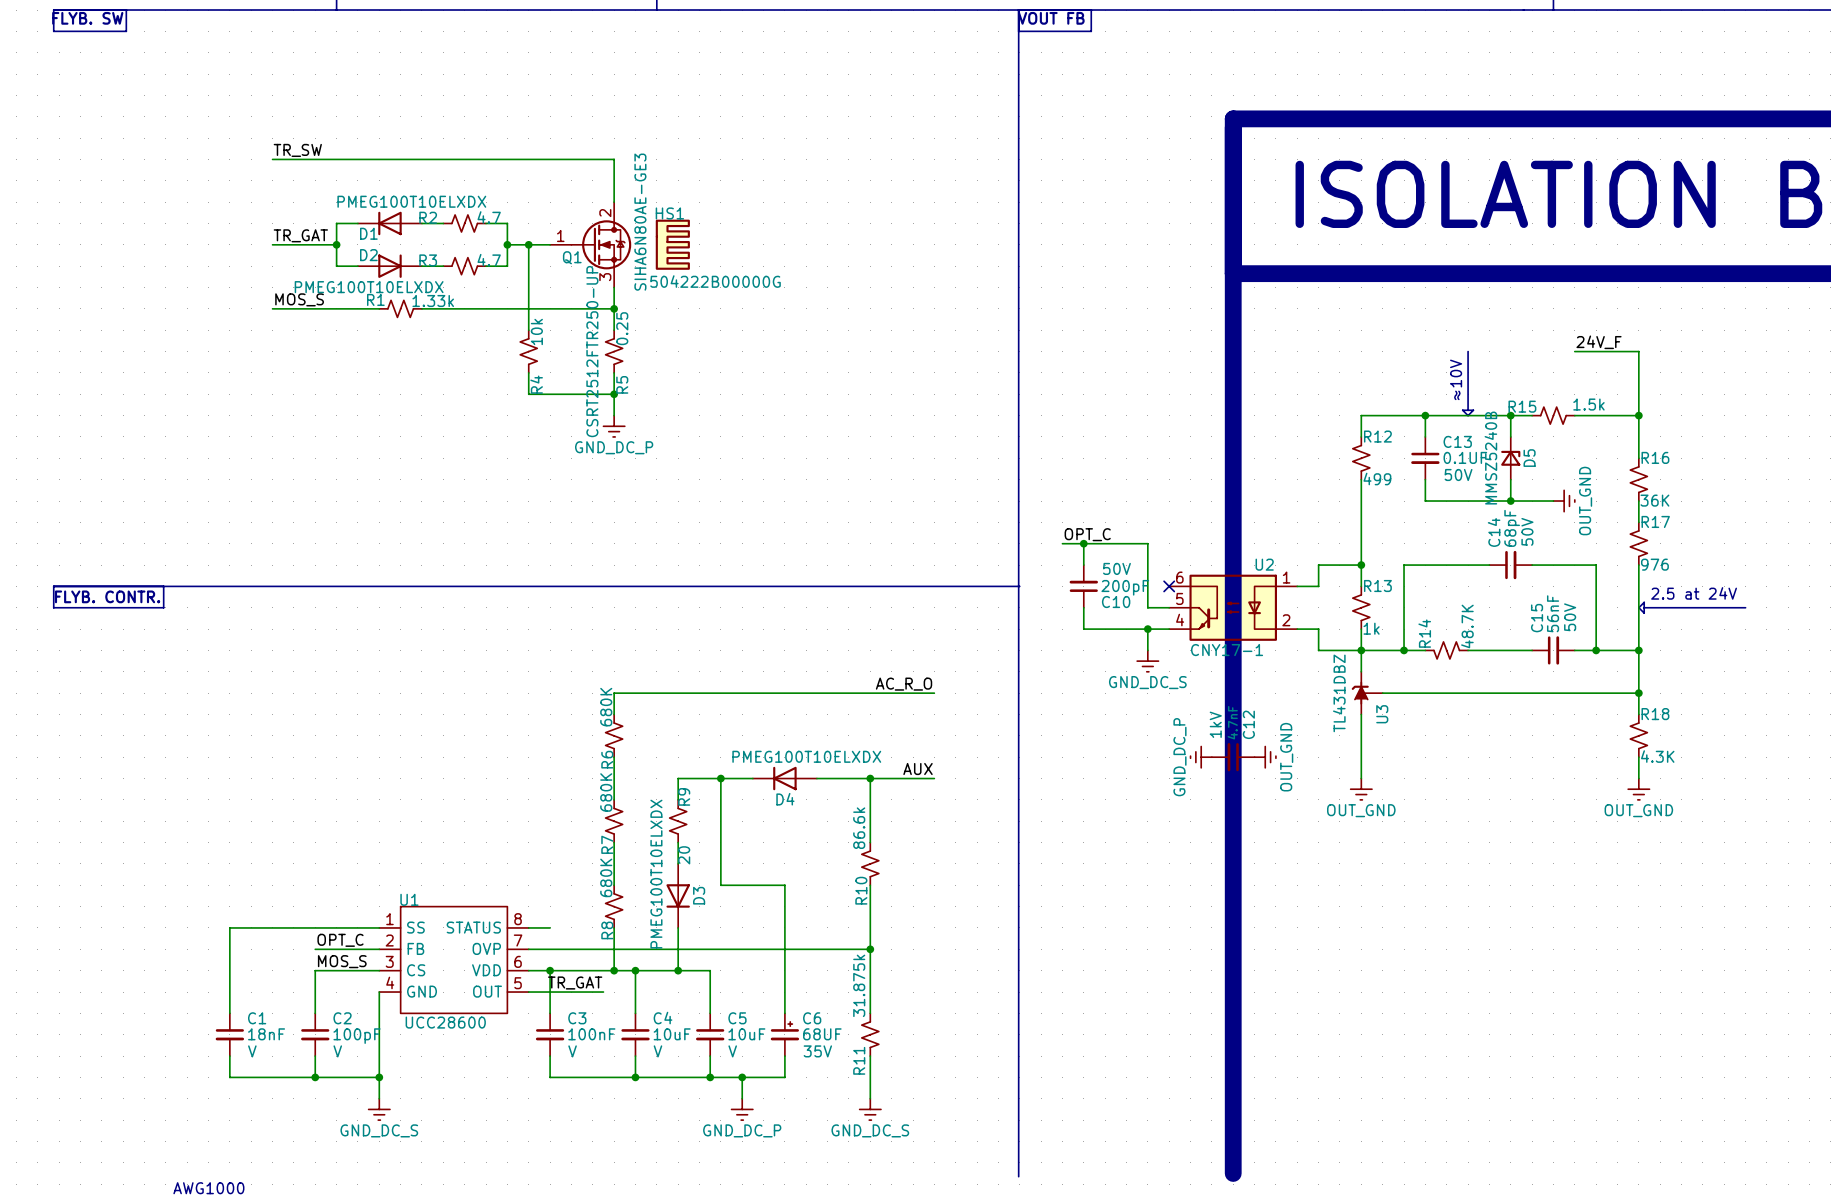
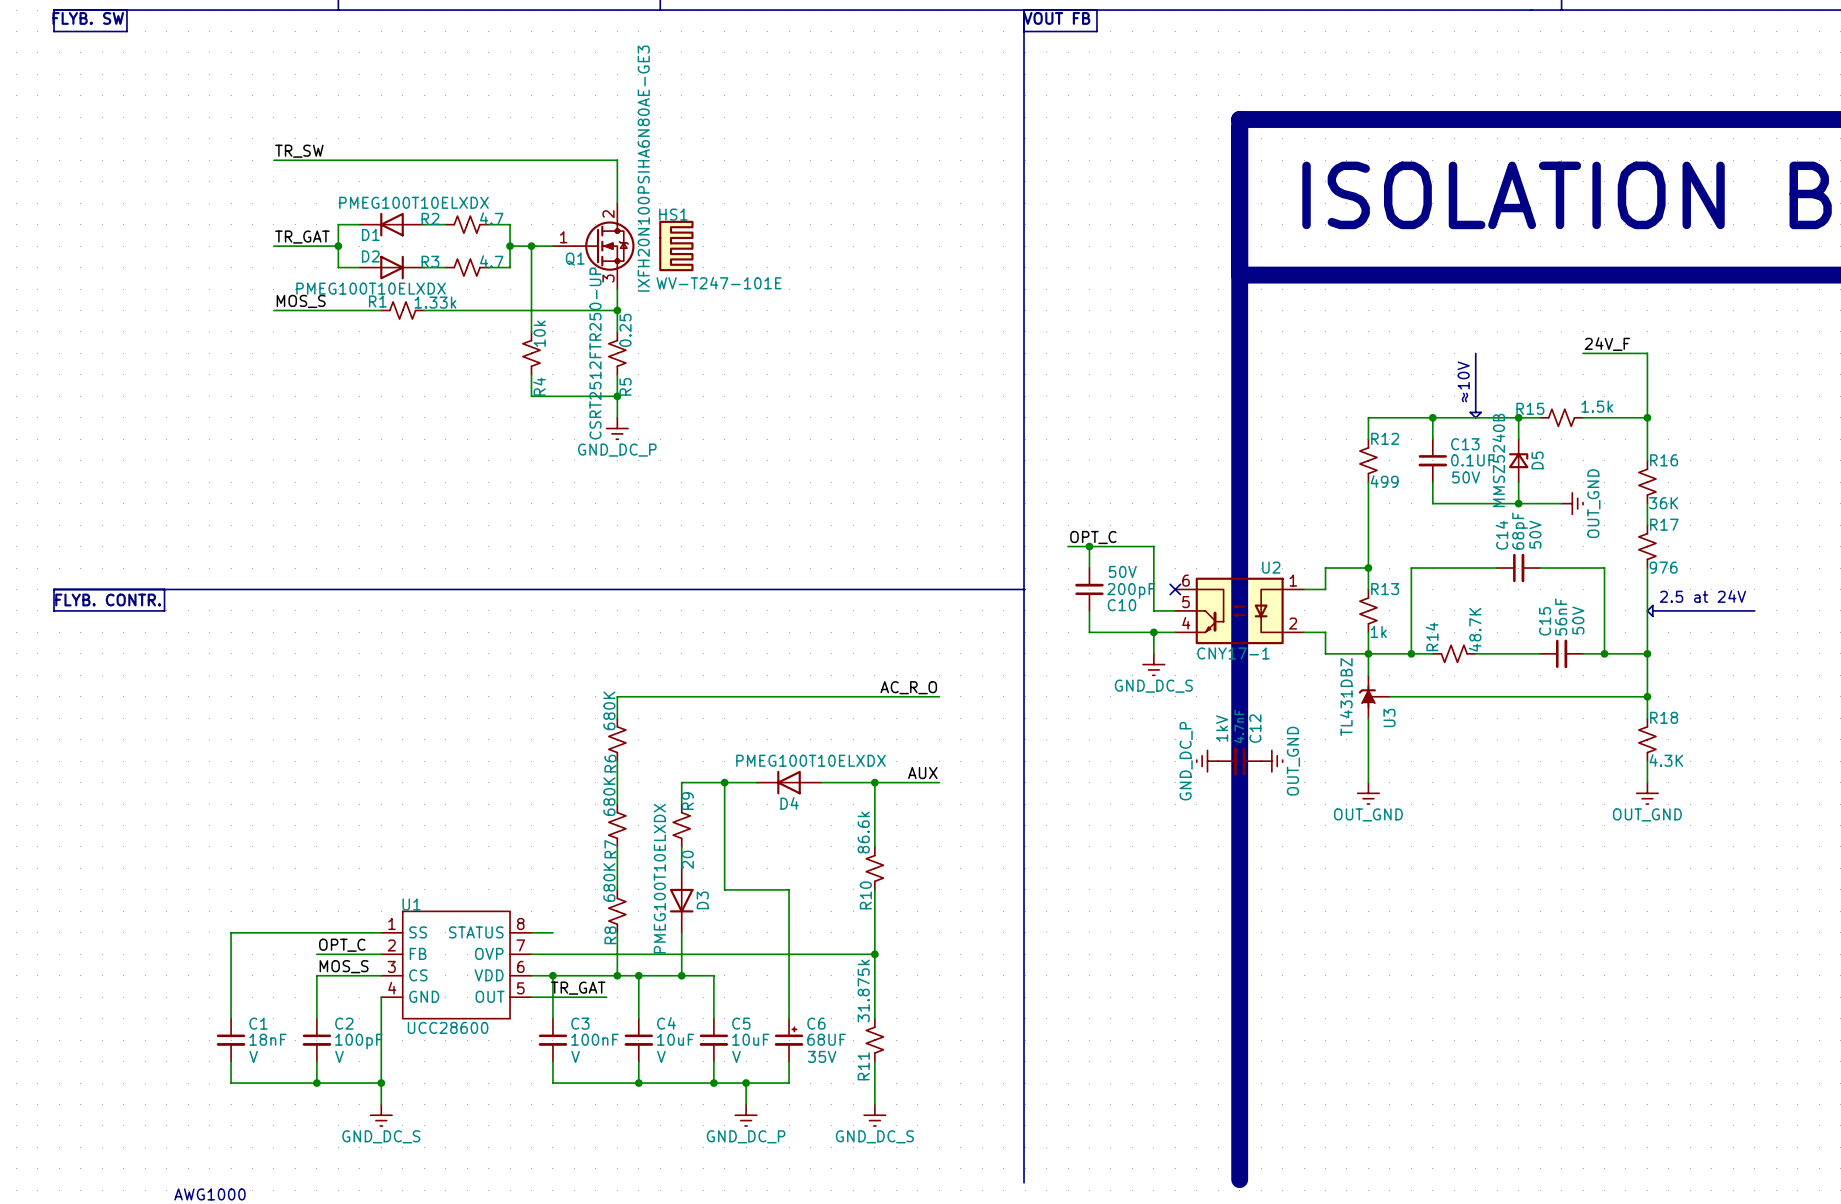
Q1 value: SIHA6N80AE-GE3 (640, 222) -> IXFH20N100PSIHA6N80AE-GE3 (643, 168)
HS1 value: 504222B00000G (715, 281) -> WV-T247-101E (719, 283)

